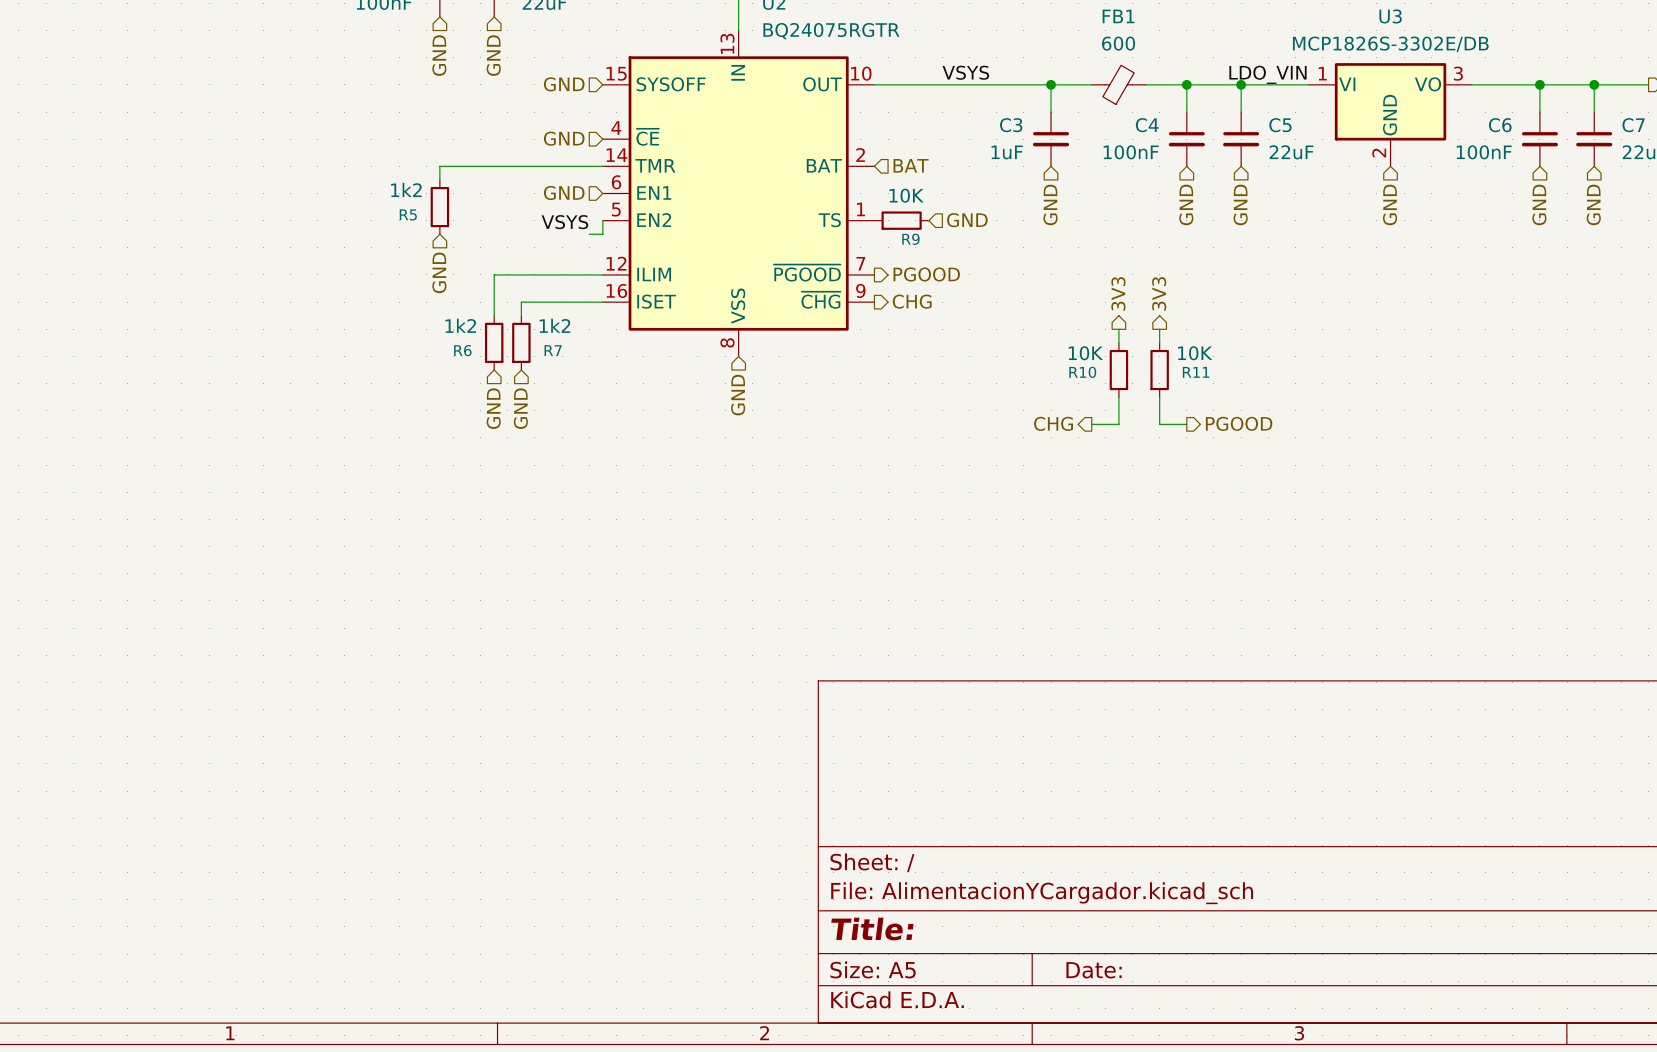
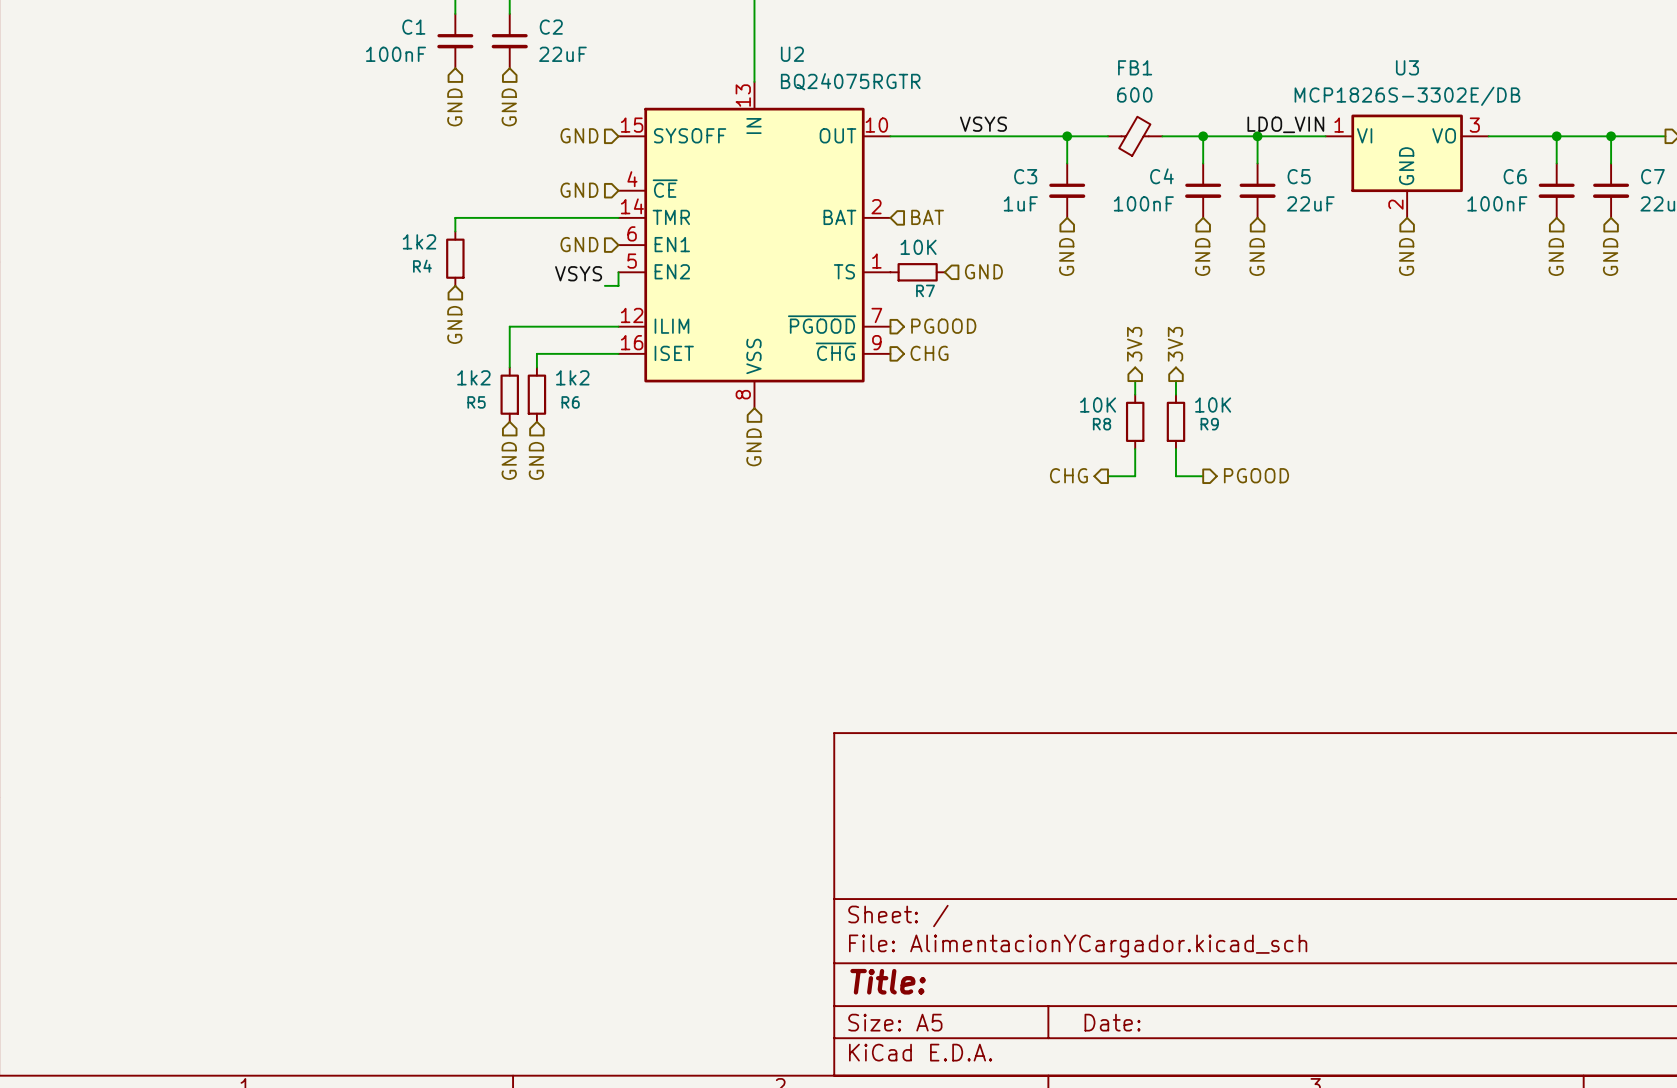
R5 name: R5 (408, 214) -> R4 (422, 266)
R9 name: R9 (910, 239) -> R7 (925, 290)
R6 name: R6 (462, 350) -> R5 (476, 402)
R7 name: R7 (553, 350) -> R6 (570, 402)
R10 name: R10 (1082, 372) -> R8 (1102, 424)
R11 name: R11 (1196, 372) -> R9 (1209, 424)

